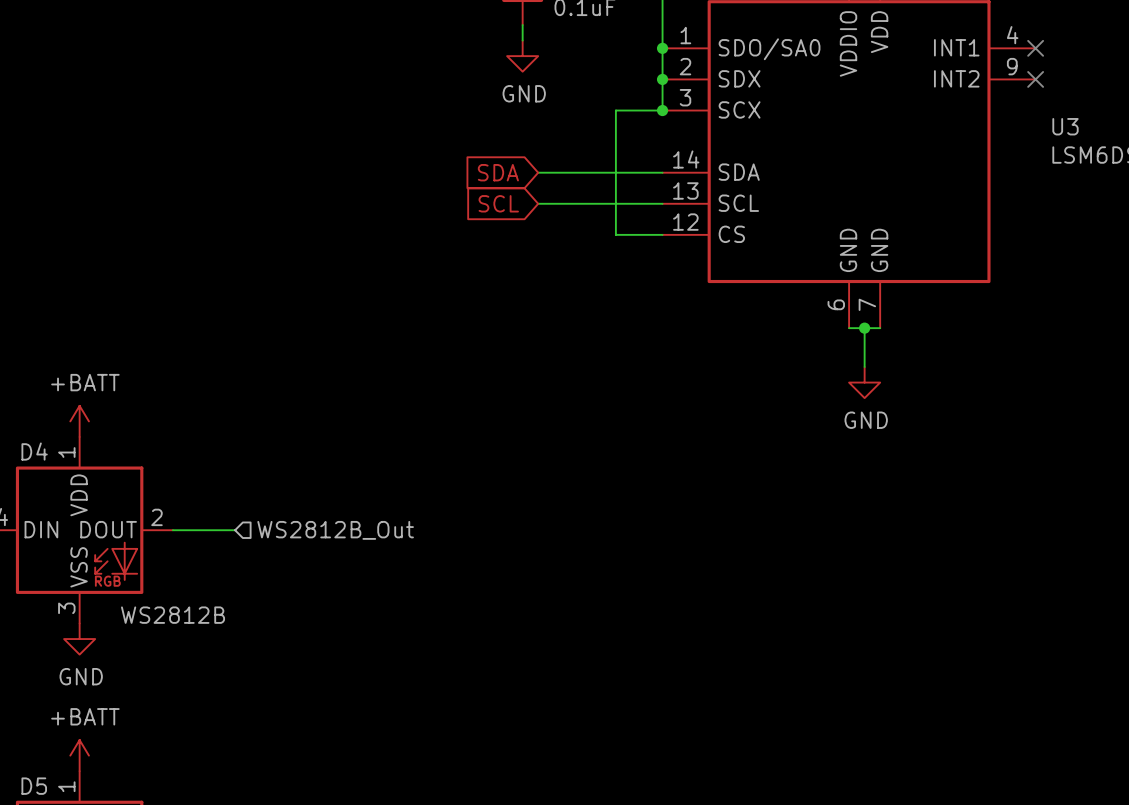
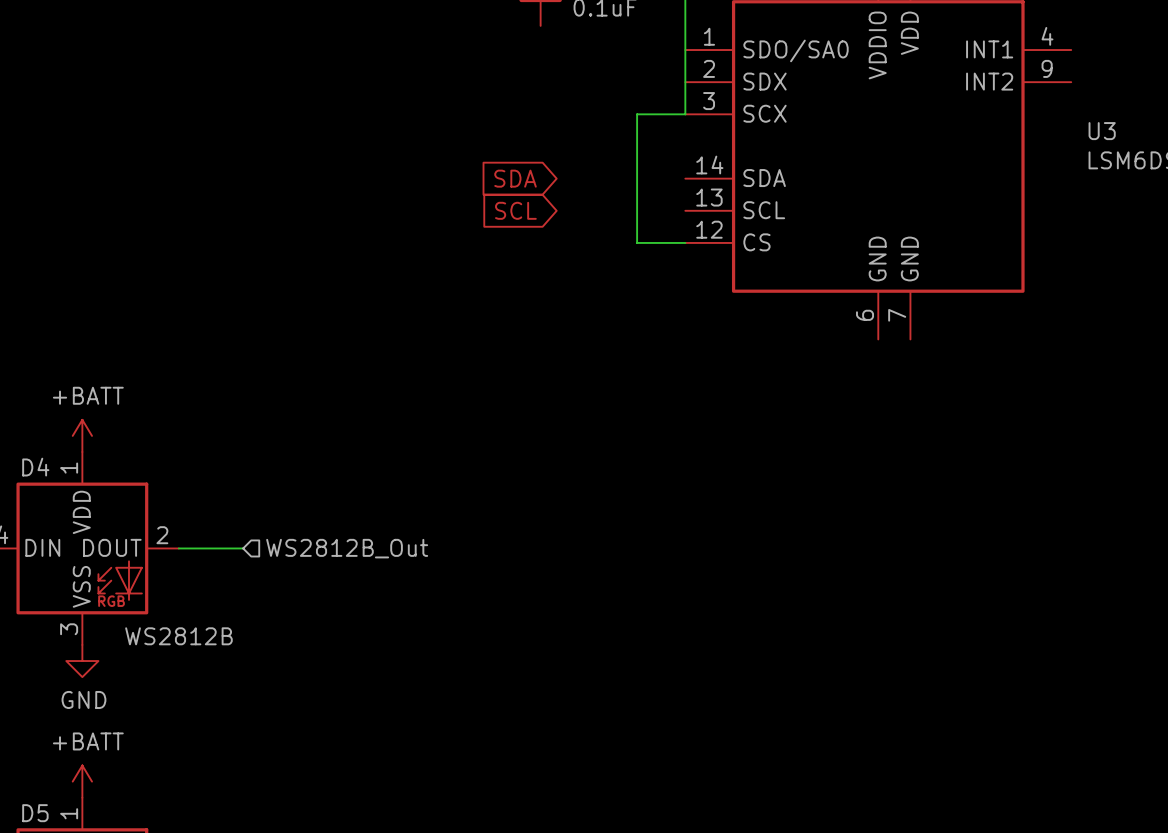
wire: (522, 25) (522, 40) -> none
junction: (662, 48) -> none
no-connect mark: (1035, 48) -> none
power symbol: GND (522, 56) -> none
junction: (662, 79) -> none
no-connect mark: (1035, 79) -> none
junction: (662, 110) -> none
wire: (538, 172) (662, 172) -> none
wire: (538, 203) (662, 203) -> none
wire: (849, 328) (880, 328) -> none
wire: (864, 328) (864, 367) -> none
junction: (864, 328) -> none
power symbol: GND (864, 382) -> none

